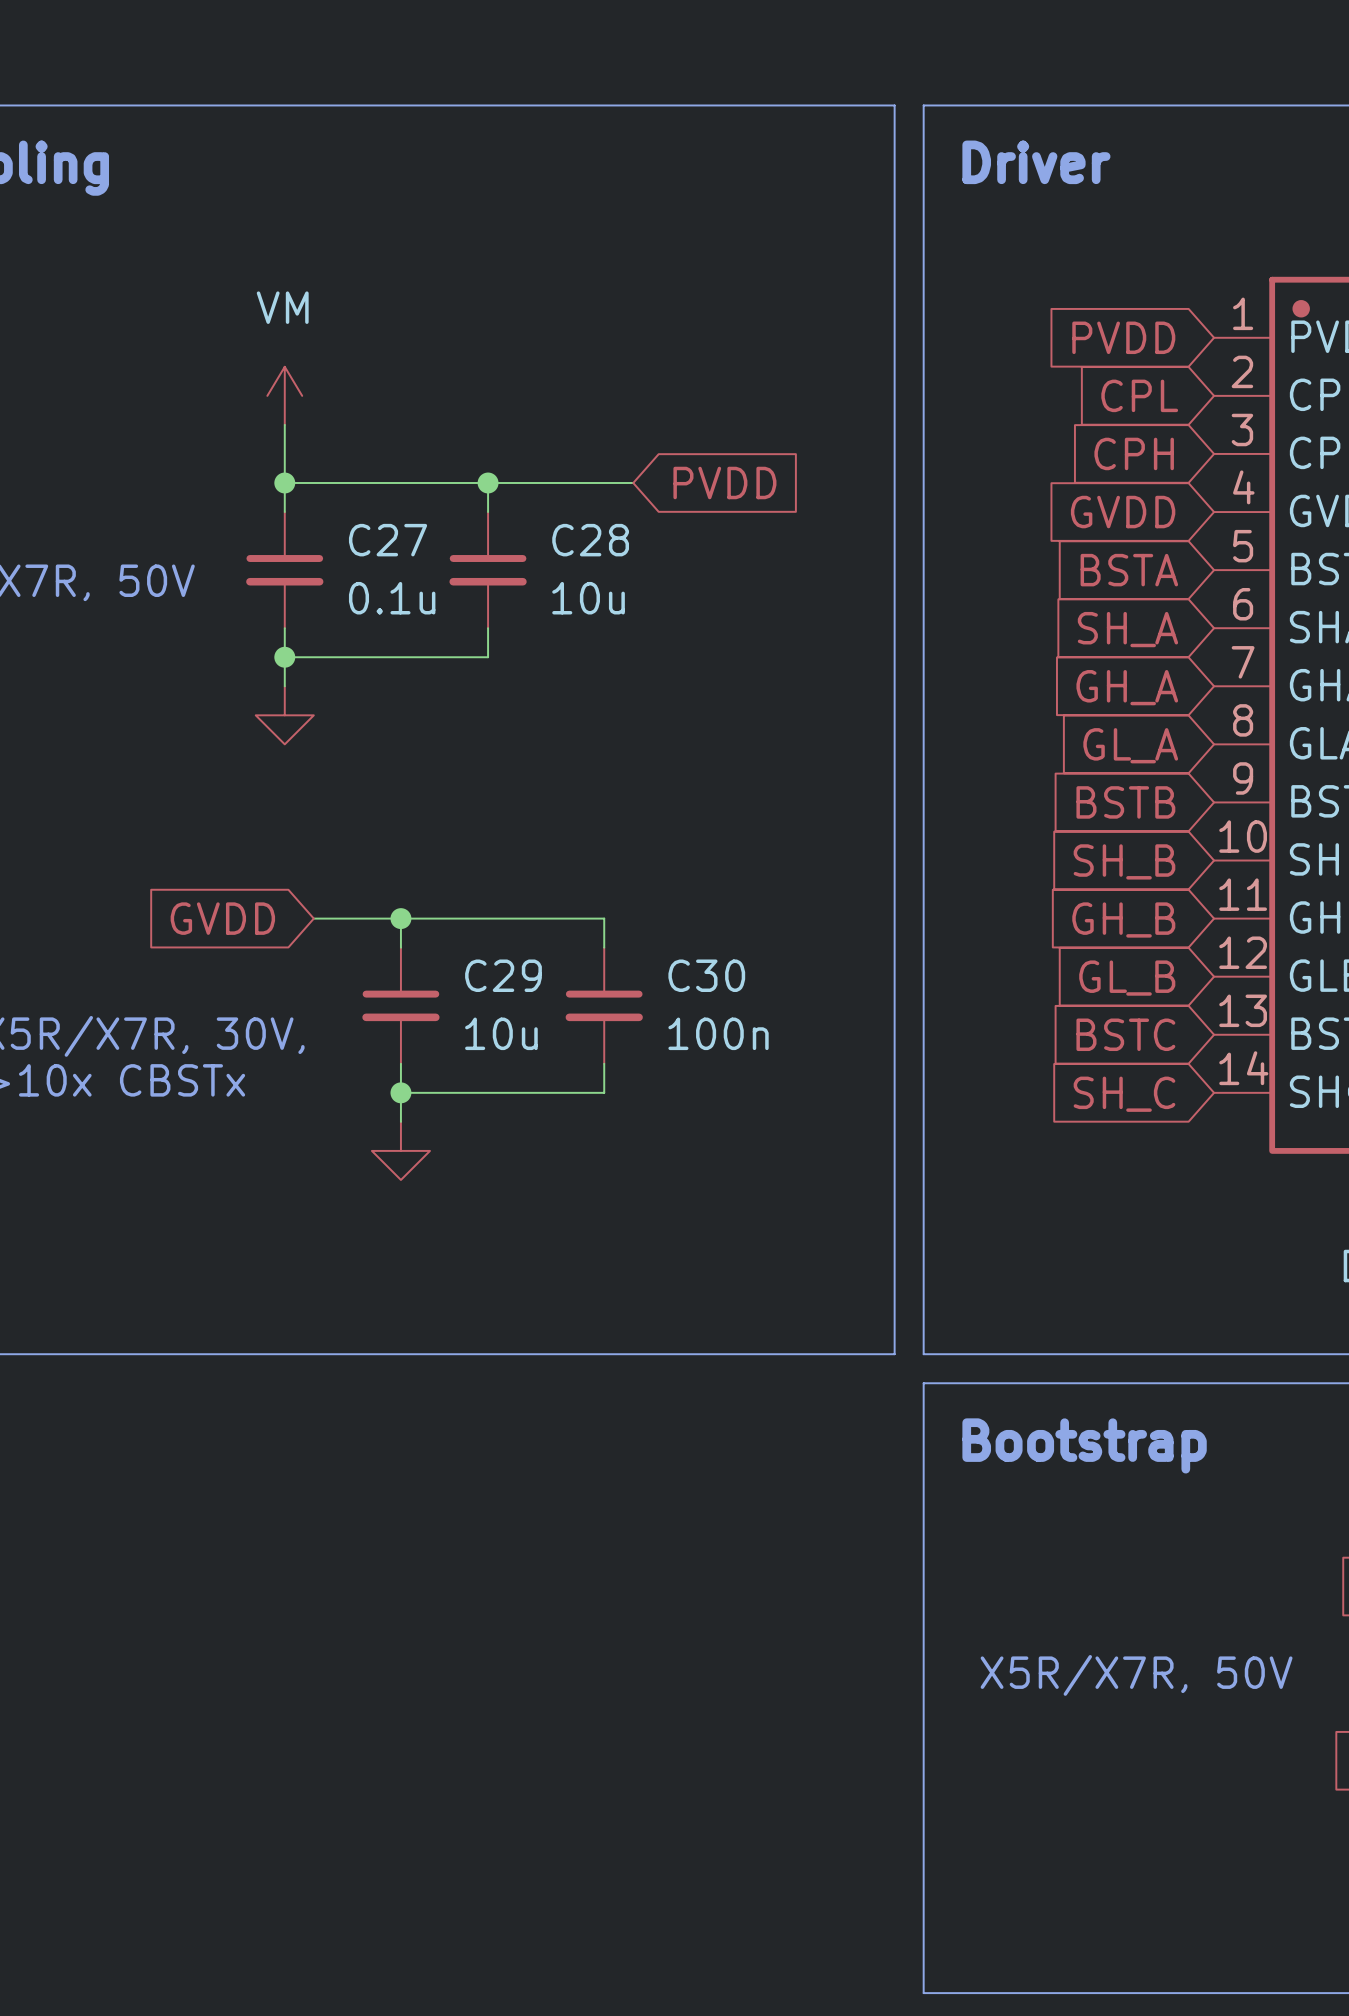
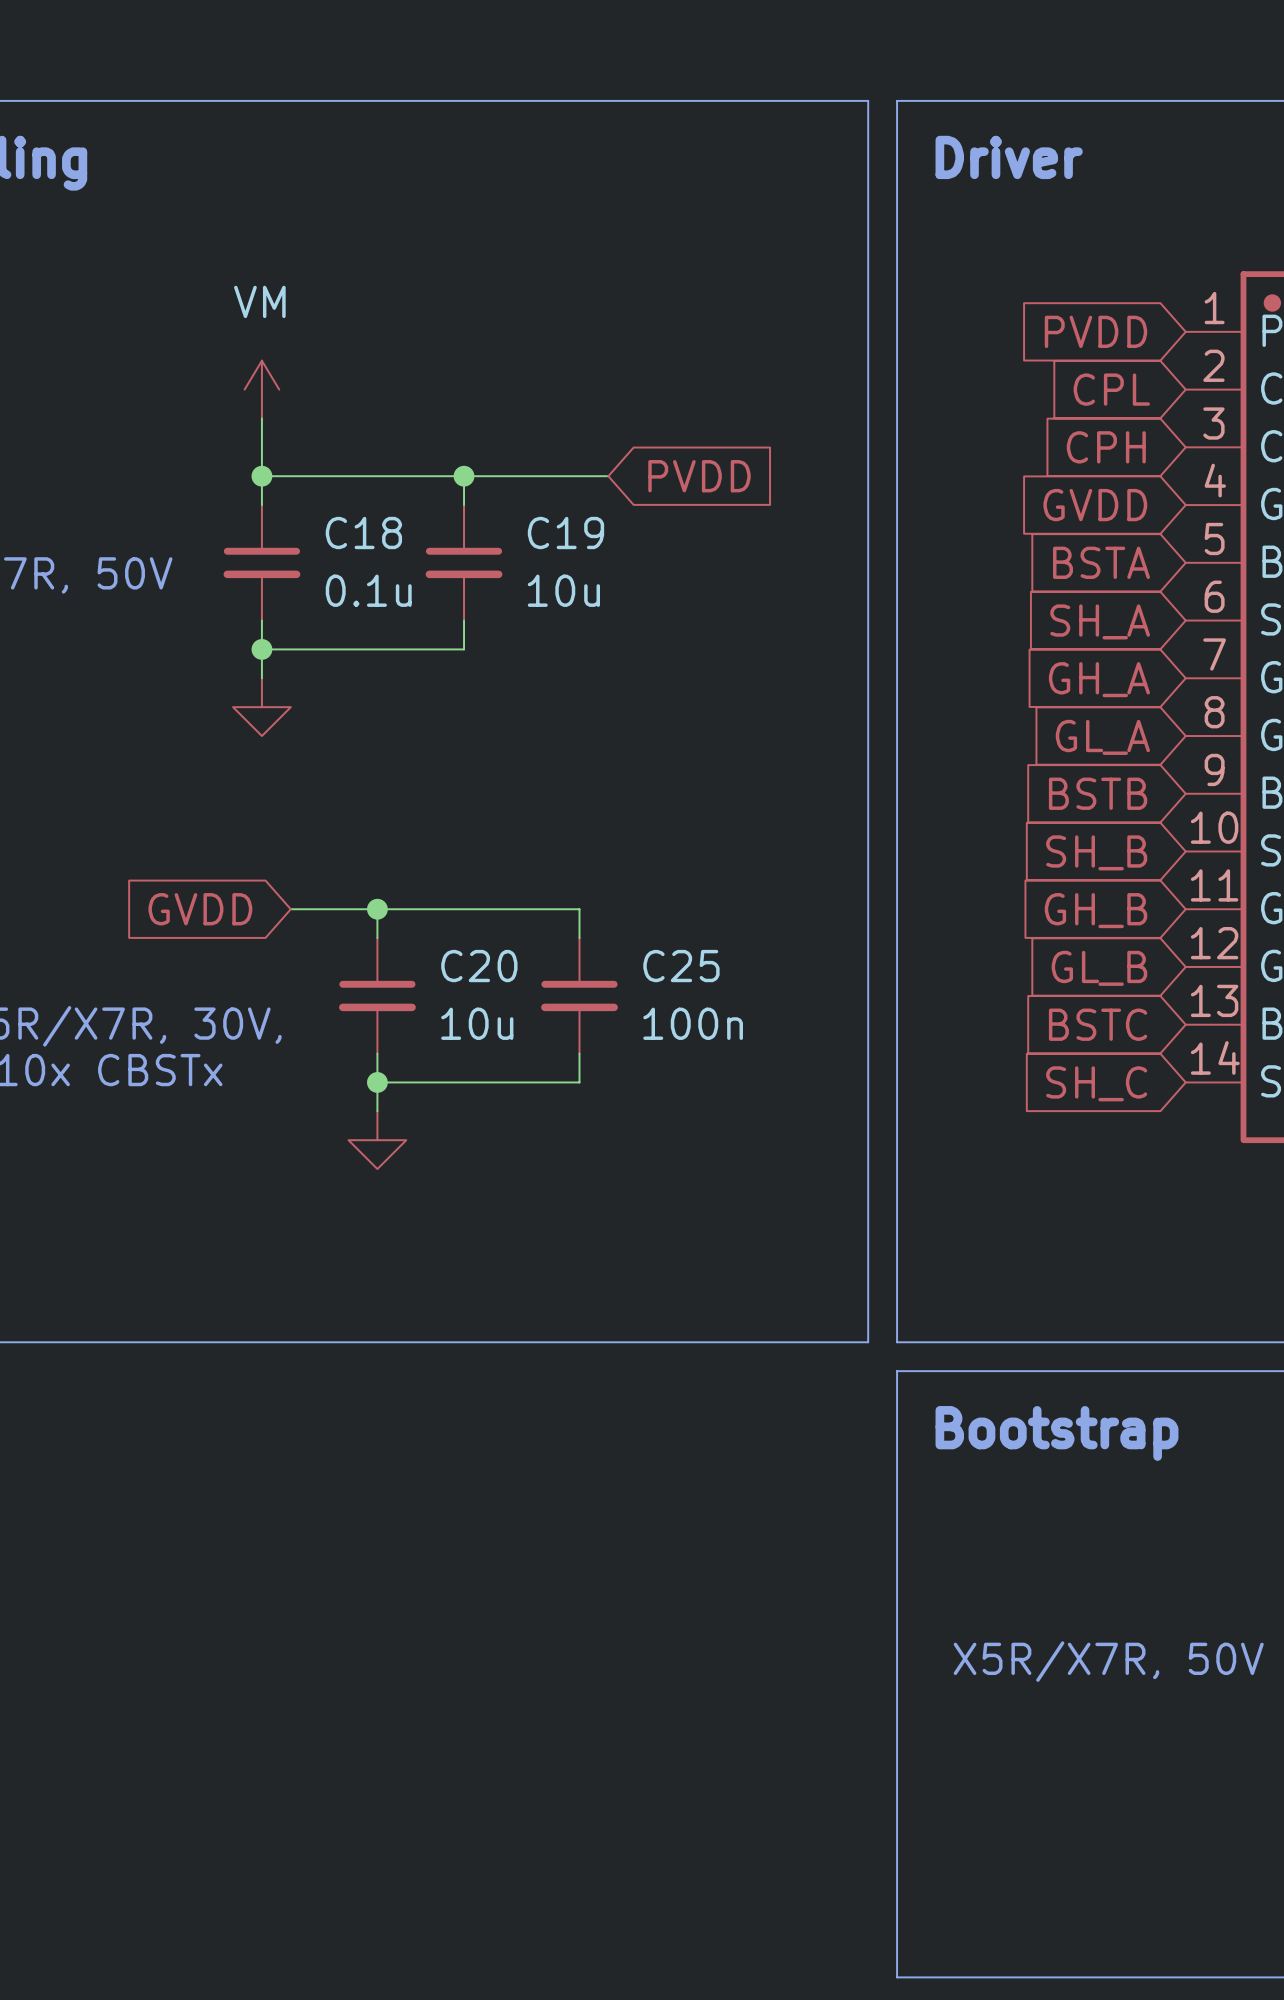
C27 name: C27 (388, 540) -> C18 (363, 533)
C28 name: C28 (590, 540) -> C19 (565, 533)
C29 name: C29 (503, 975) -> C20 (479, 966)
C30 name: C30 (706, 975) -> C25 (681, 966)

